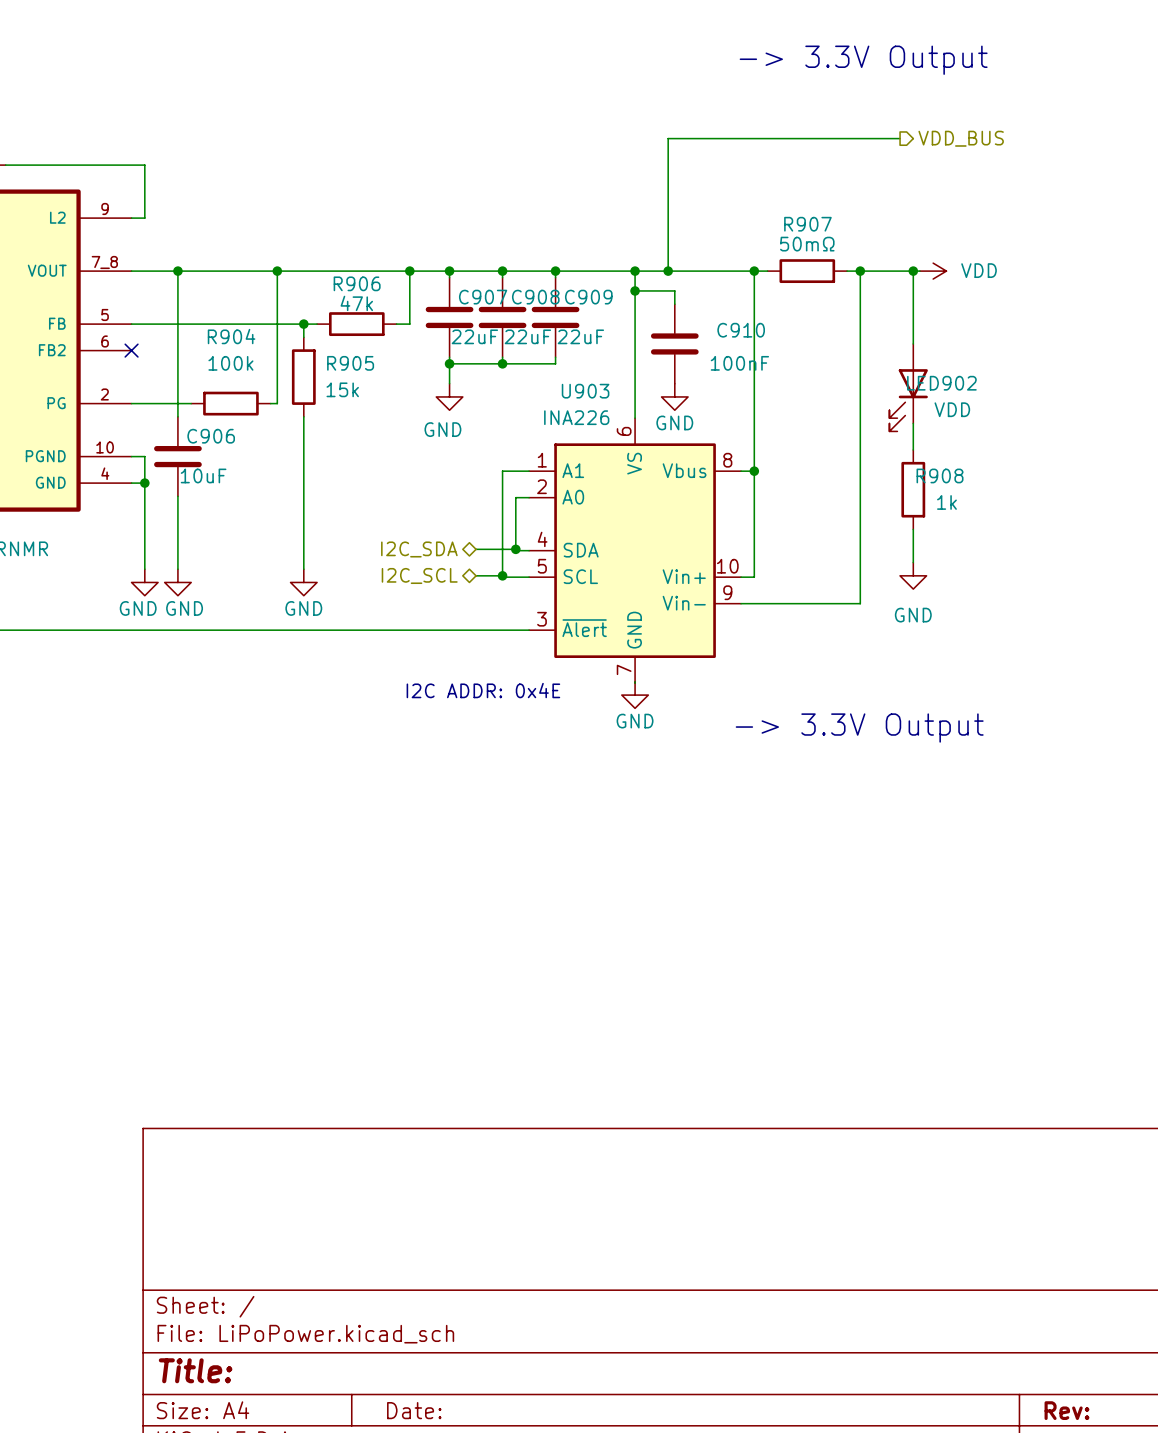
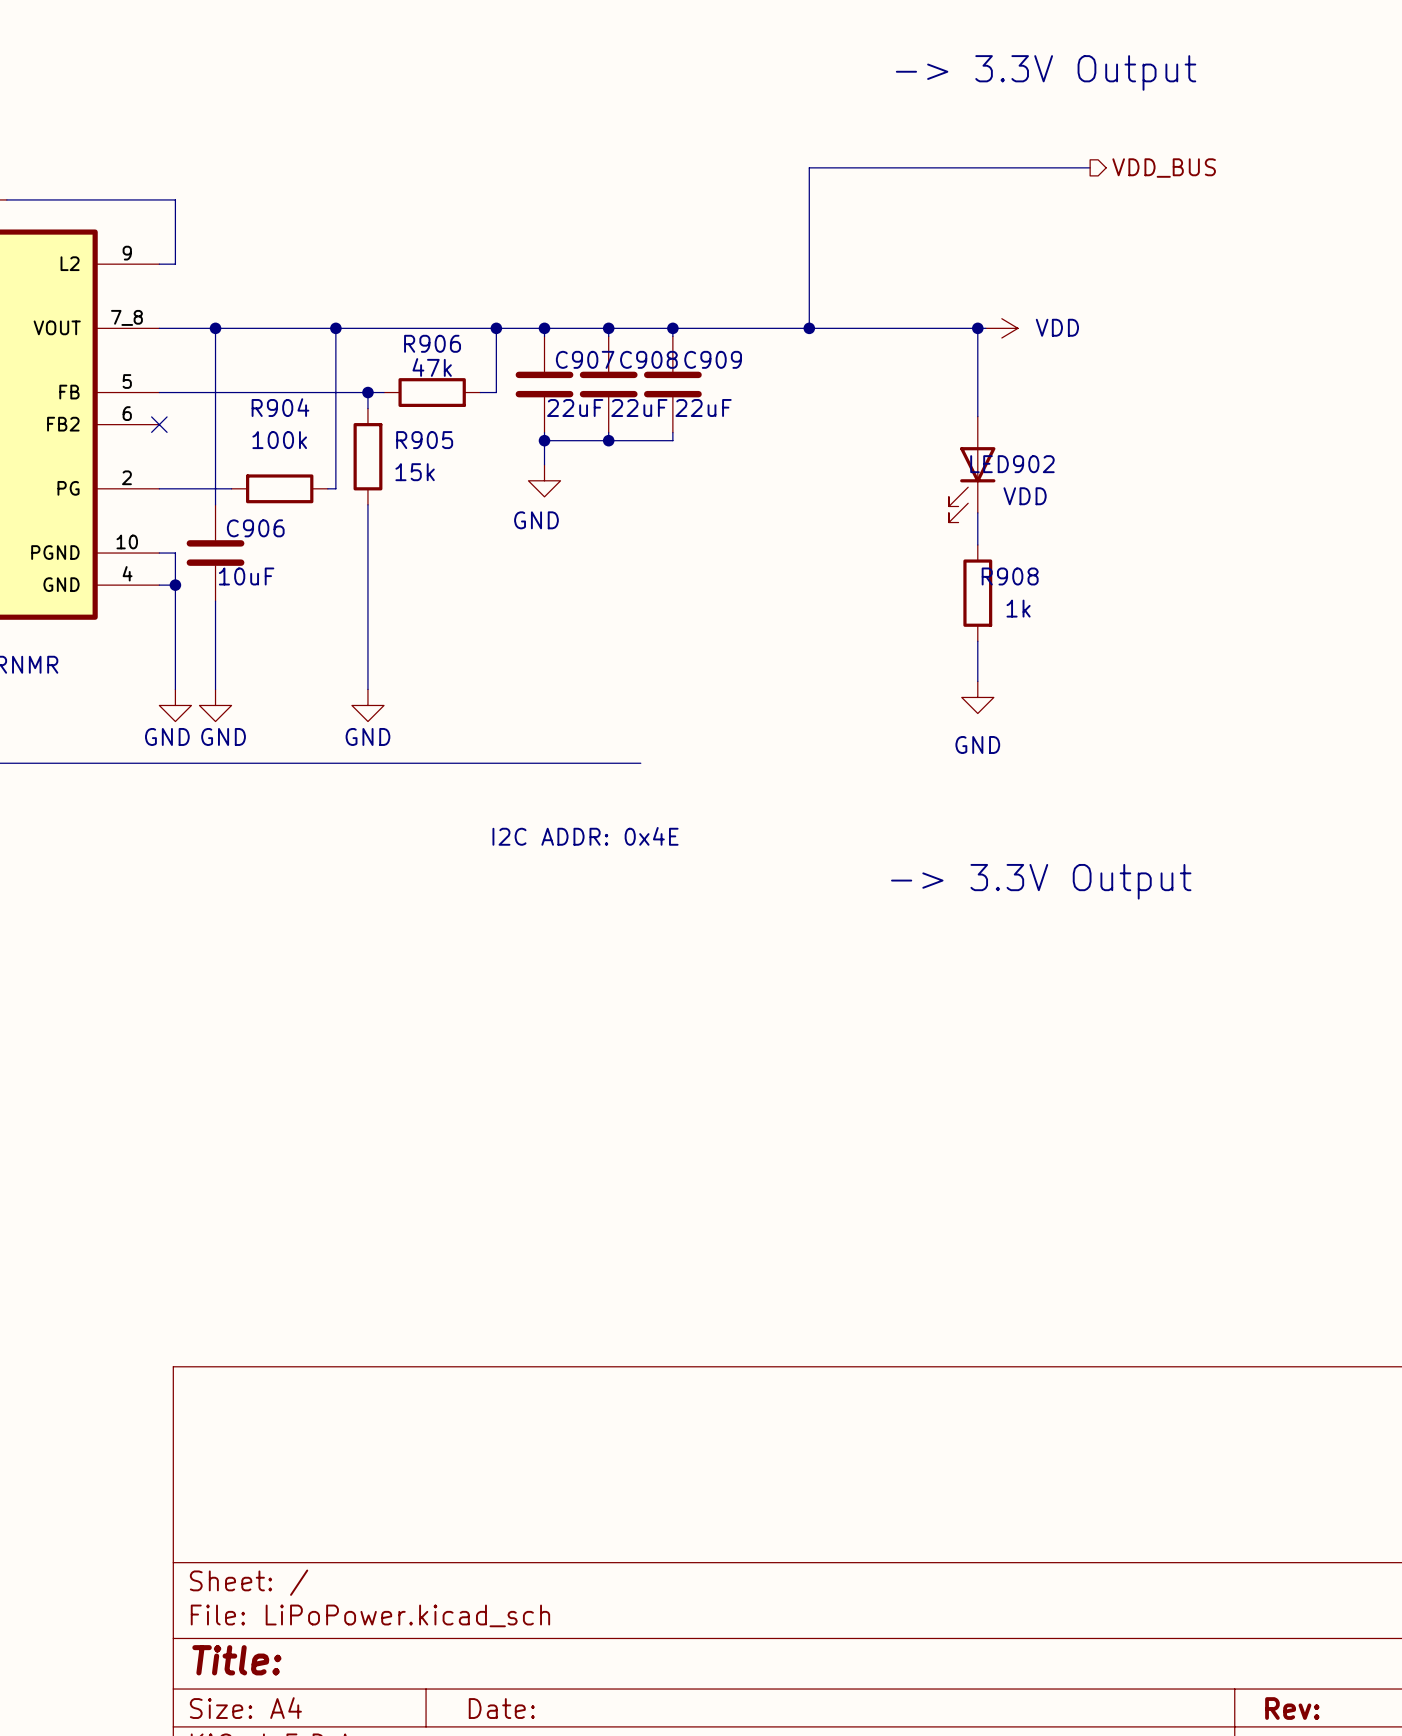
wire: (635, 271) (635, 418) -> none
junction: (635, 271) -> none
wire: (754, 271) (754, 577) (741, 577) -> none
junction: (754, 271) -> none
wire: none -> (929, 328) (985, 328)
junction: none -> (977, 328)
R907: 50mΩ (807, 271) -> none
wire: (847, 271) (919, 271) -> none
wire: (860, 271) (860, 603) (741, 603) -> none
junction: (860, 271) -> none
wire: (913, 271) (913, 343) -> (977, 328) (977, 416)
junction: (913, 271) -> none
power symbol position: VDD (933, 271) -> VDD (1001, 328)
wire: (635, 290) (674, 290) (674, 304) -> none
junction: (635, 290) -> none
C910: 100nF (674, 343) -> none
LED902 position: (908, 387) -> (972, 469)
power symbol: GND (674, 396) -> none
wire: (913, 423) (913, 449) -> (977, 512) (977, 545)
wire: (529, 471) (502, 471) (502, 577) (529, 577) -> none
wire: (741, 471) (754, 471) -> none
junction: (754, 471) -> none
R908 position: (913, 489) -> (977, 593)
wire: (529, 497) (515, 497) (515, 550) (529, 550) -> none
wire: (913, 529) (913, 562) -> (977, 641) (977, 681)
hierarchical label: I2C_SDA (419, 549) -> none
wire: (476, 549) (515, 549) -> none
junction: (515, 549) -> none
U903: INA226 (635, 550) -> none
hierarchical label: I2C_SCL (419, 575) -> none
wire: (476, 575) (502, 575) -> none
junction: (502, 575) -> none
power symbol: none -> GND (977, 697)
power symbol: GND (913, 575) -> none
wire: (635, 681) (635, 683) -> none
power symbol: GND (635, 695) -> none

